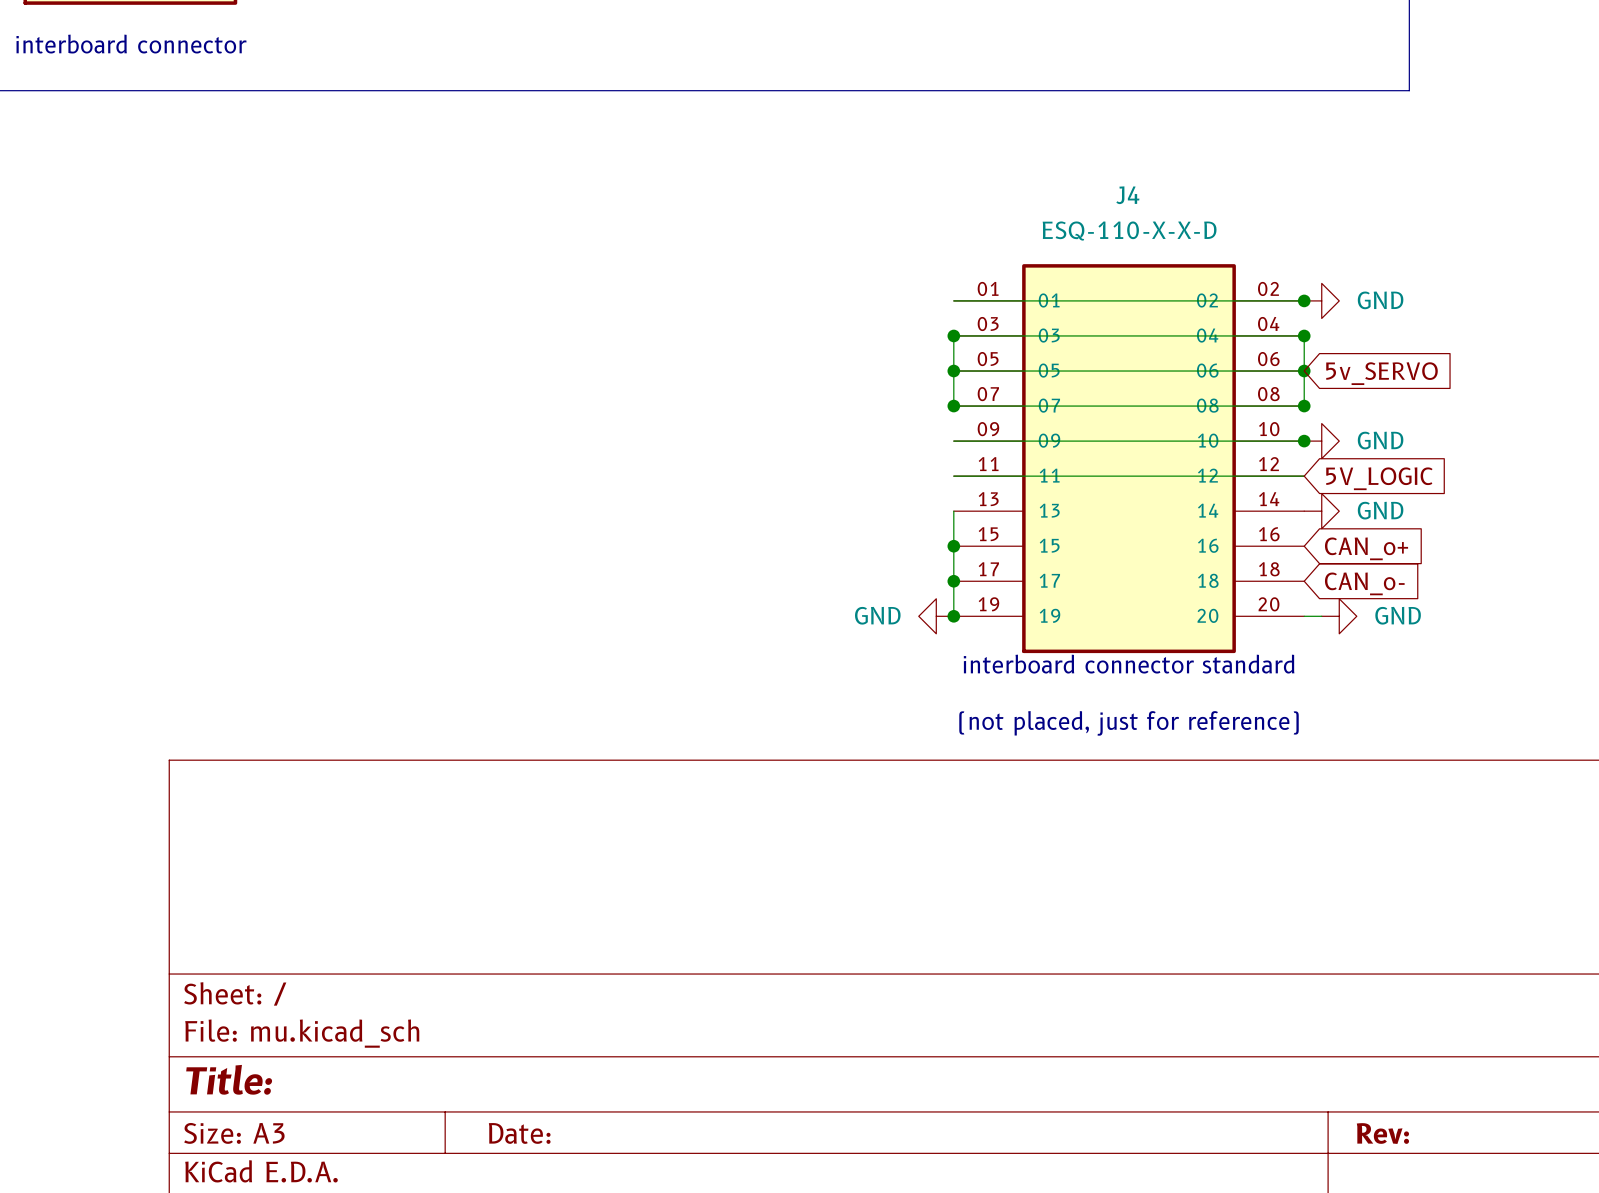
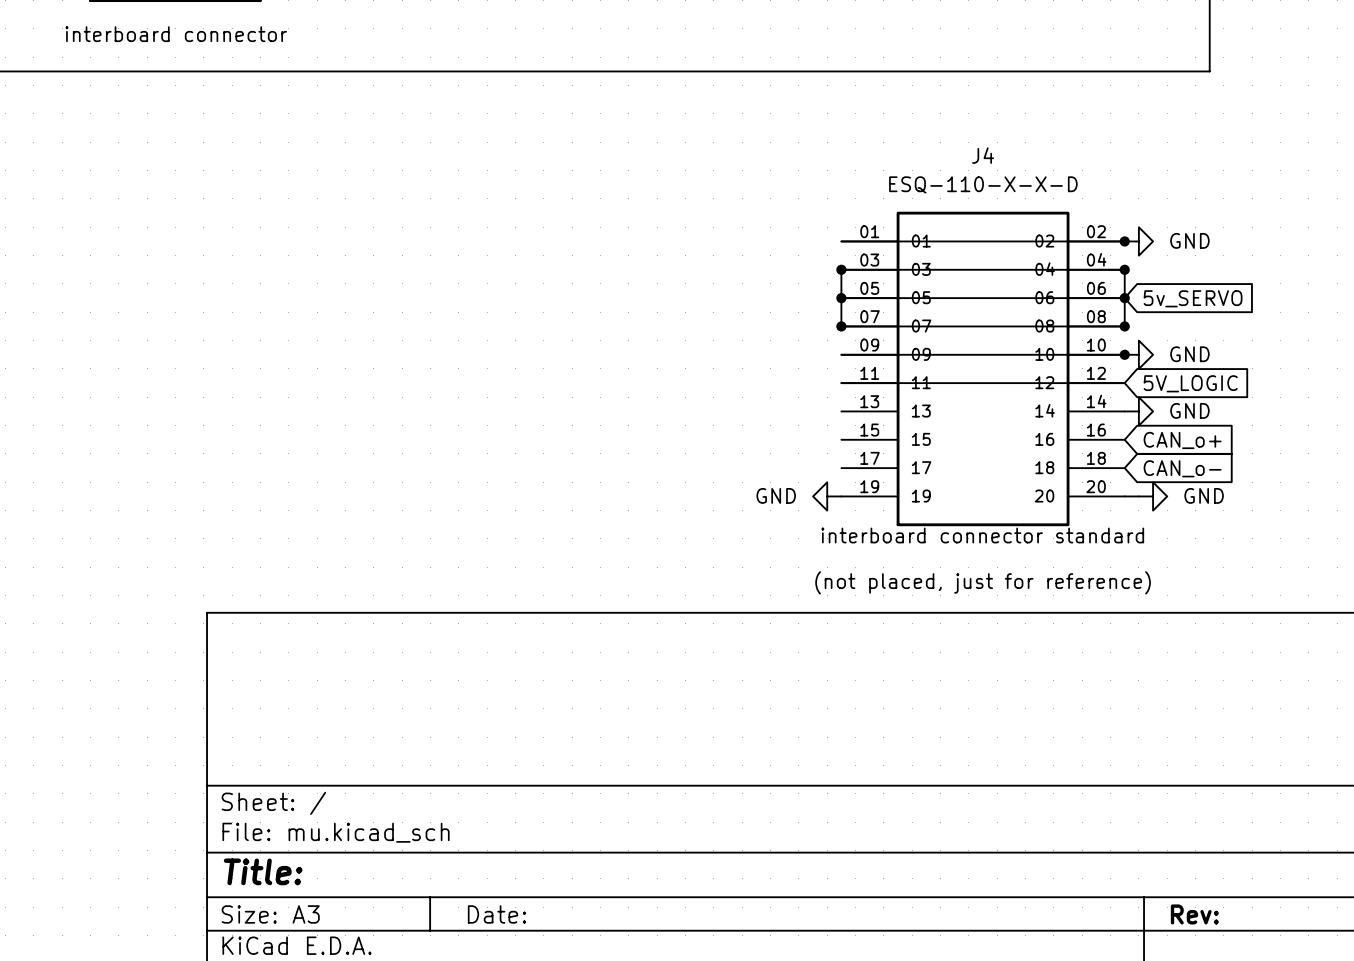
wire: (953, 511) (953, 616) -> none
junction: (953, 546) -> none
junction: (953, 581) -> none
junction: (953, 616) -> none

